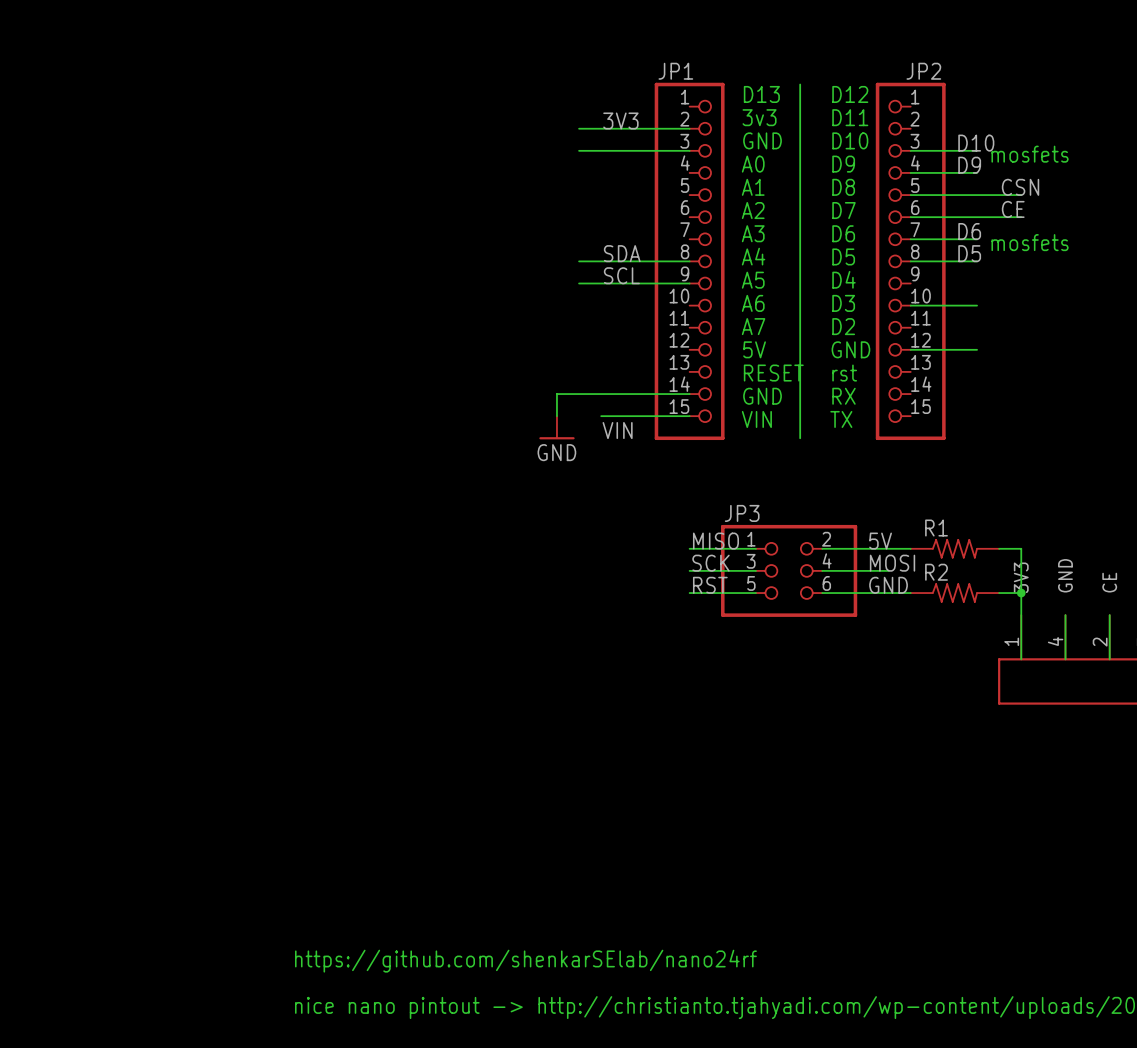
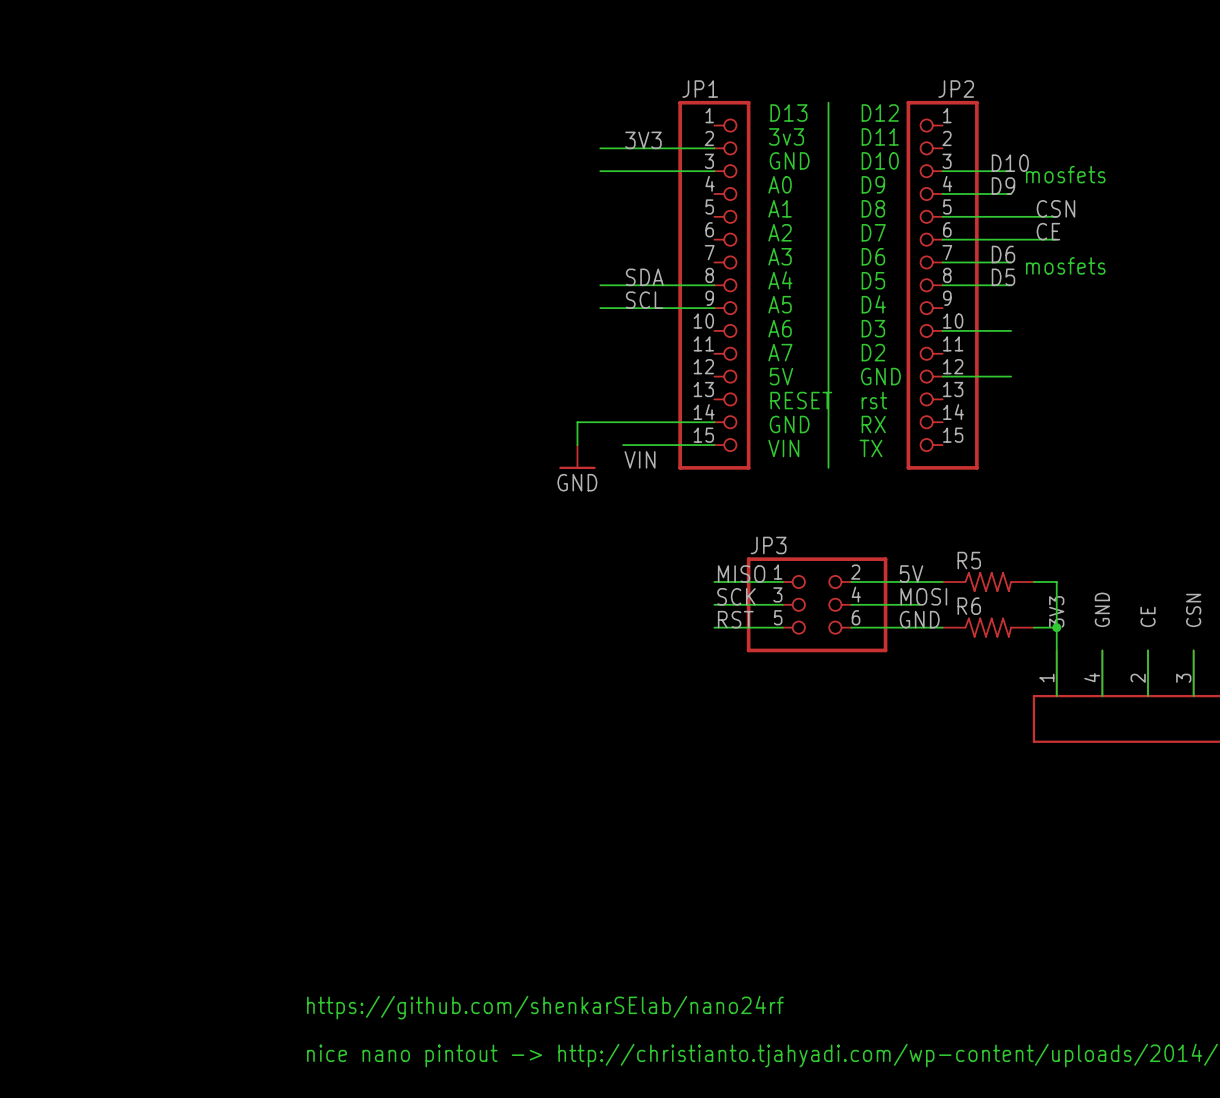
R1 name: R1 (936, 528) -> R5 (969, 560)
R2 name: R2 (936, 572) -> R6 (969, 606)

